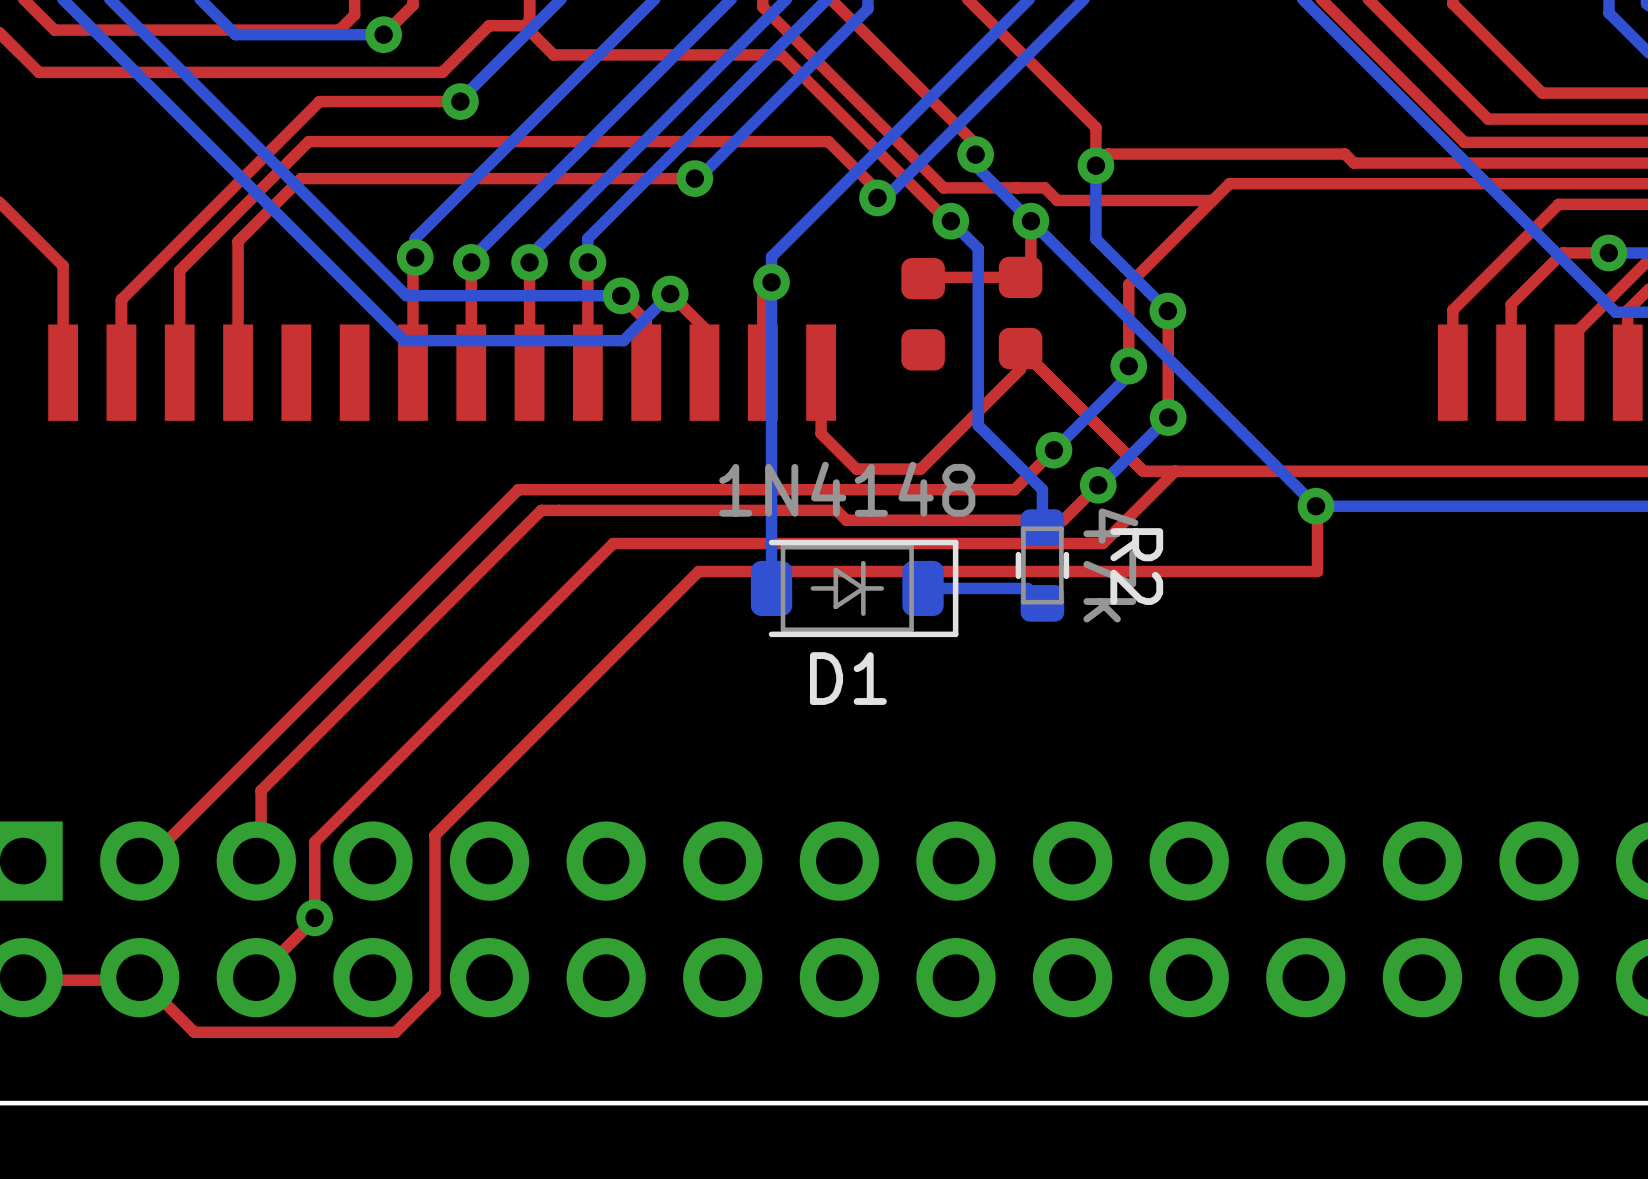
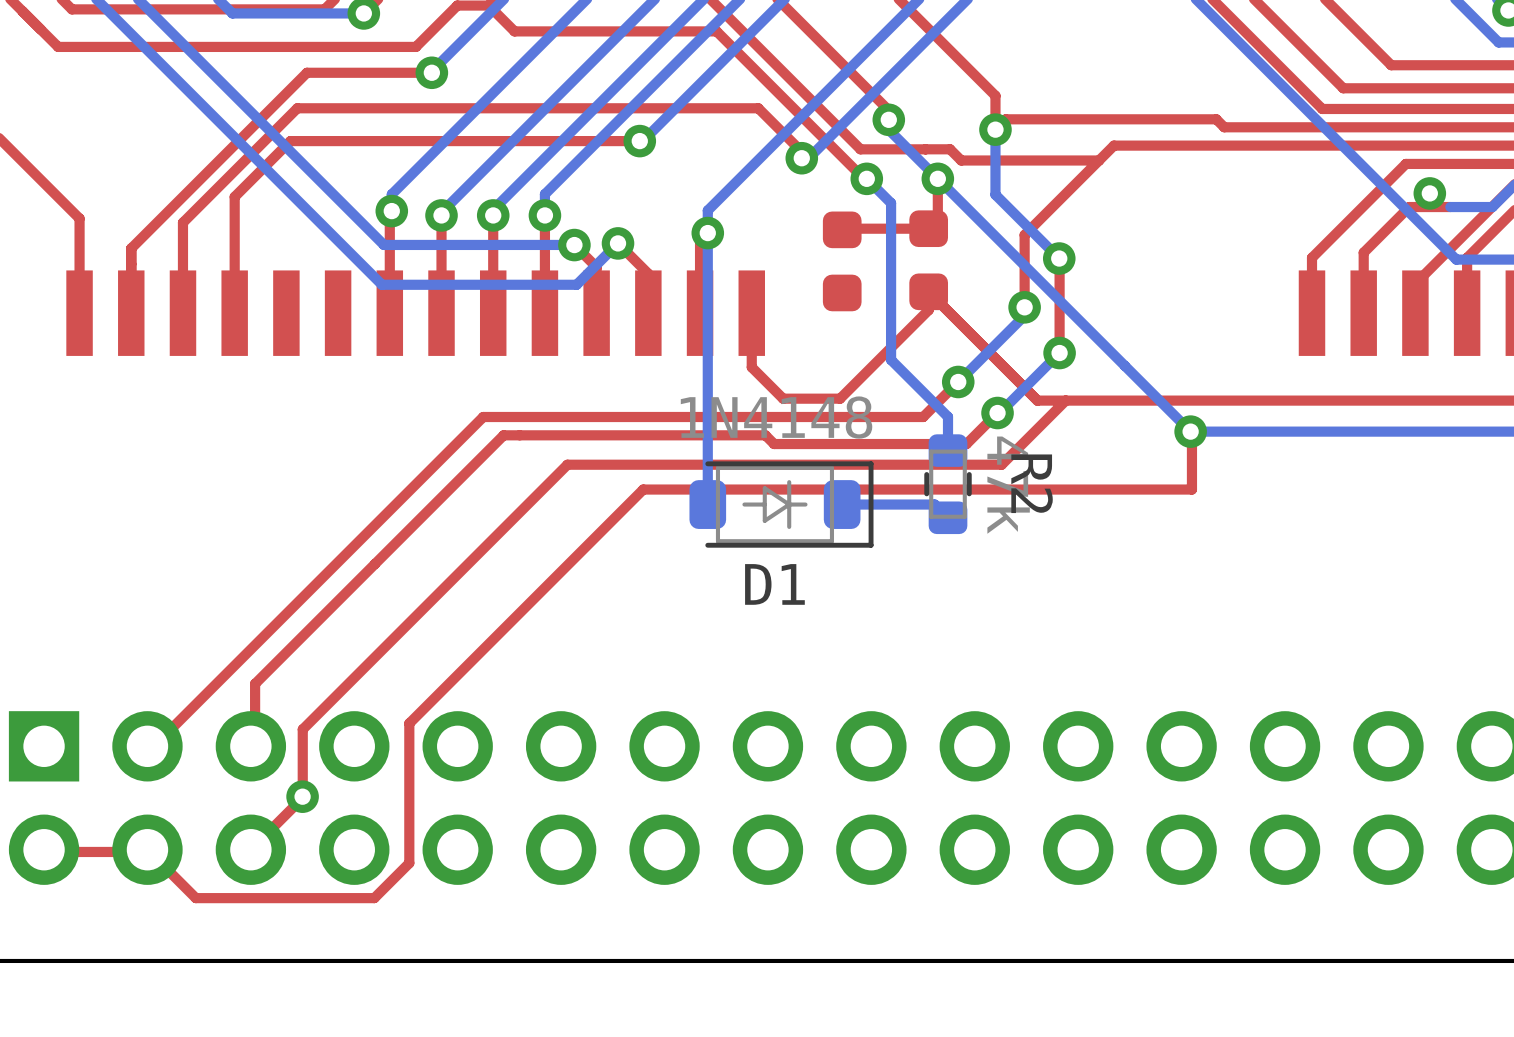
via position: (1608, 252) -> (1429, 193)

